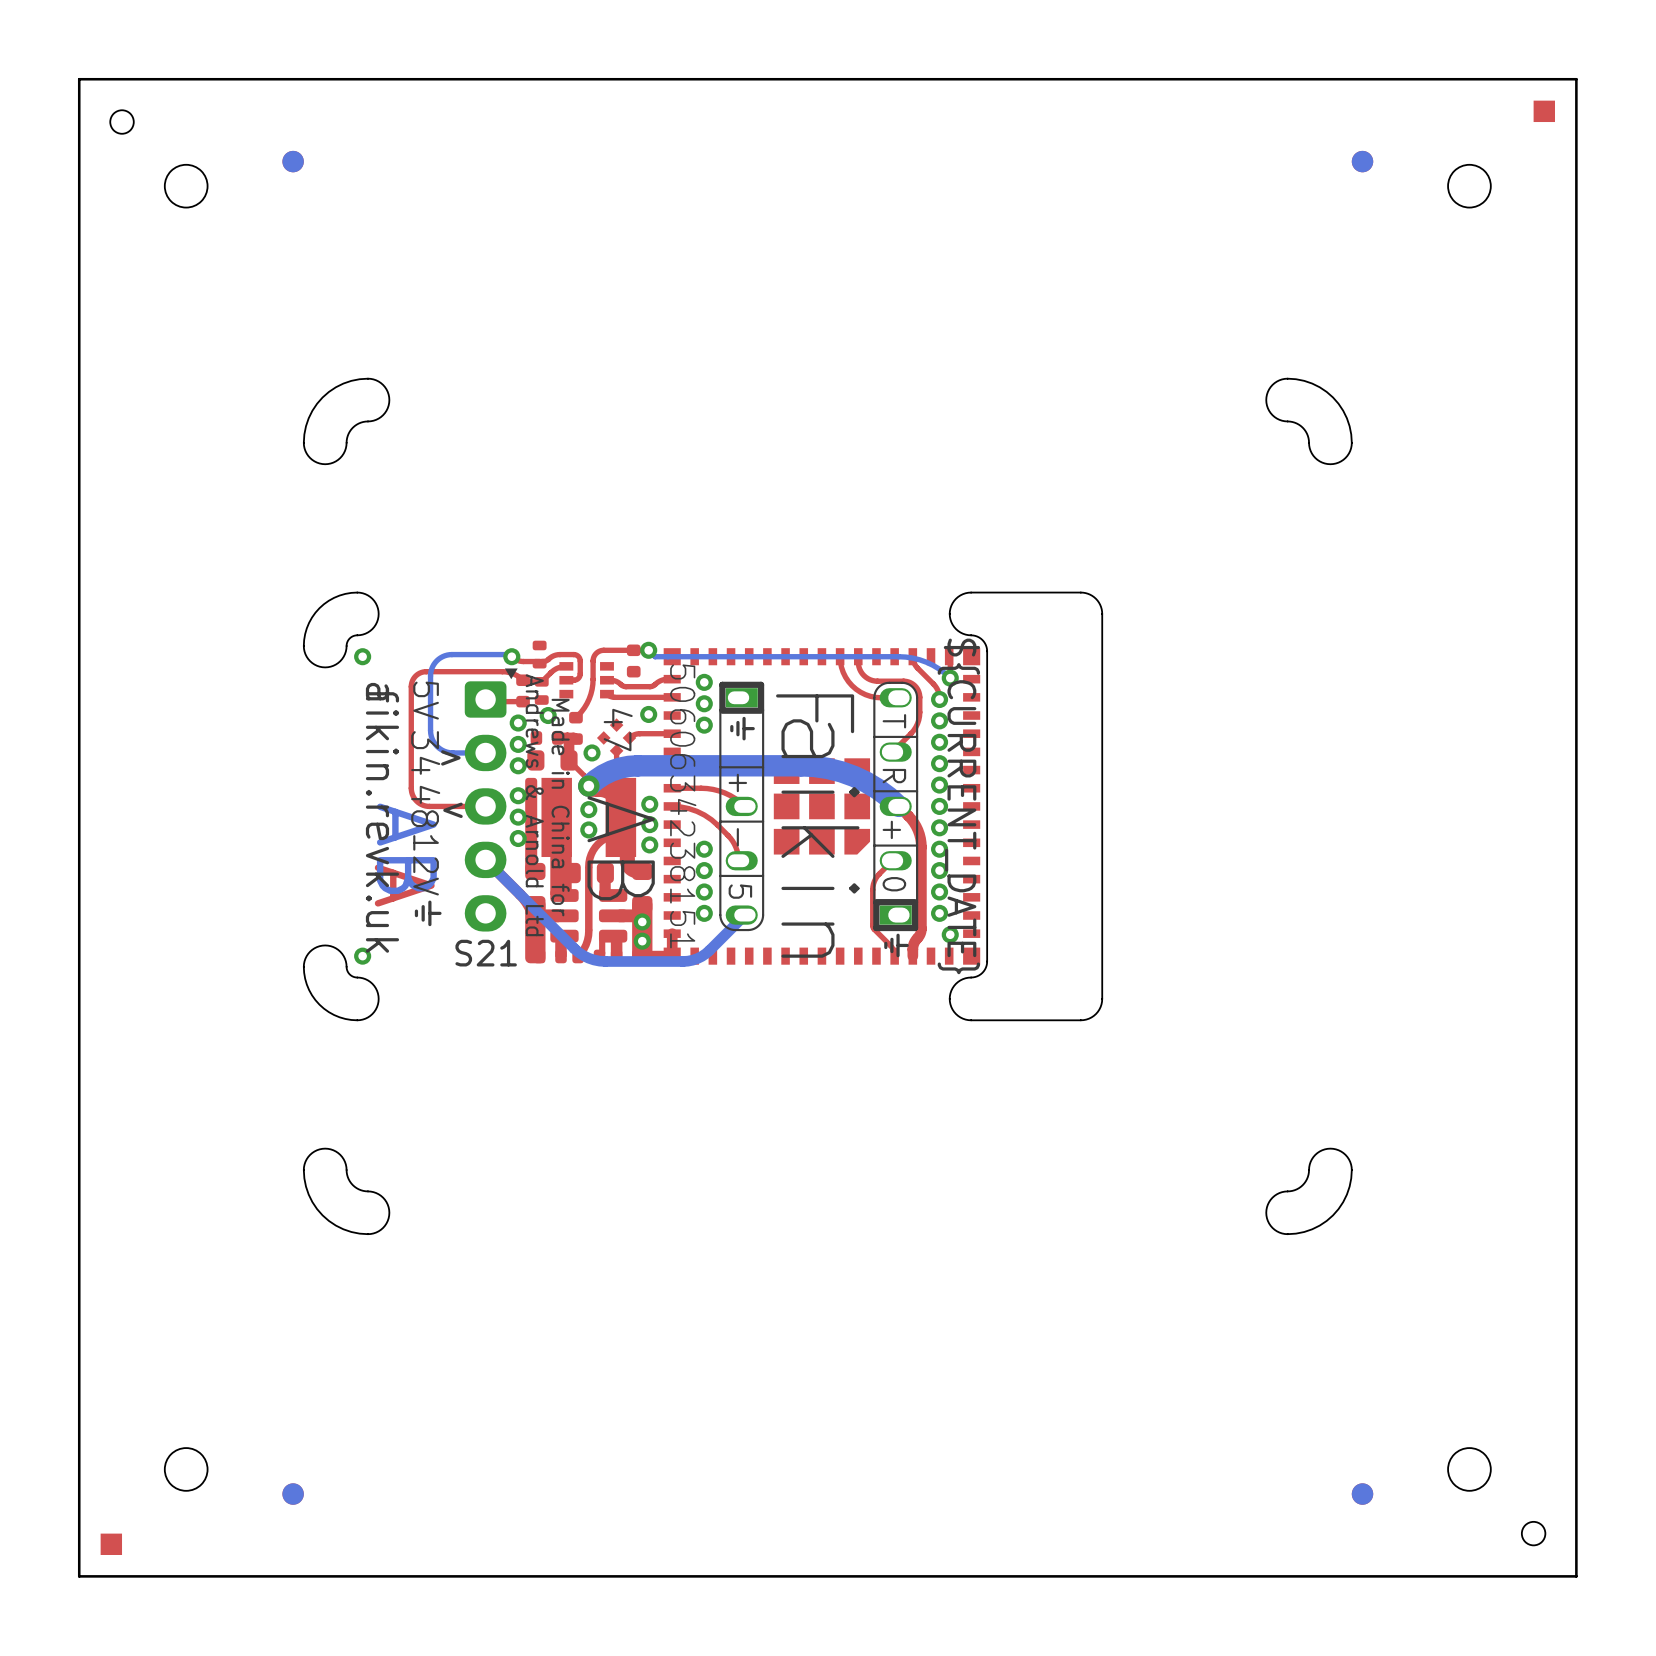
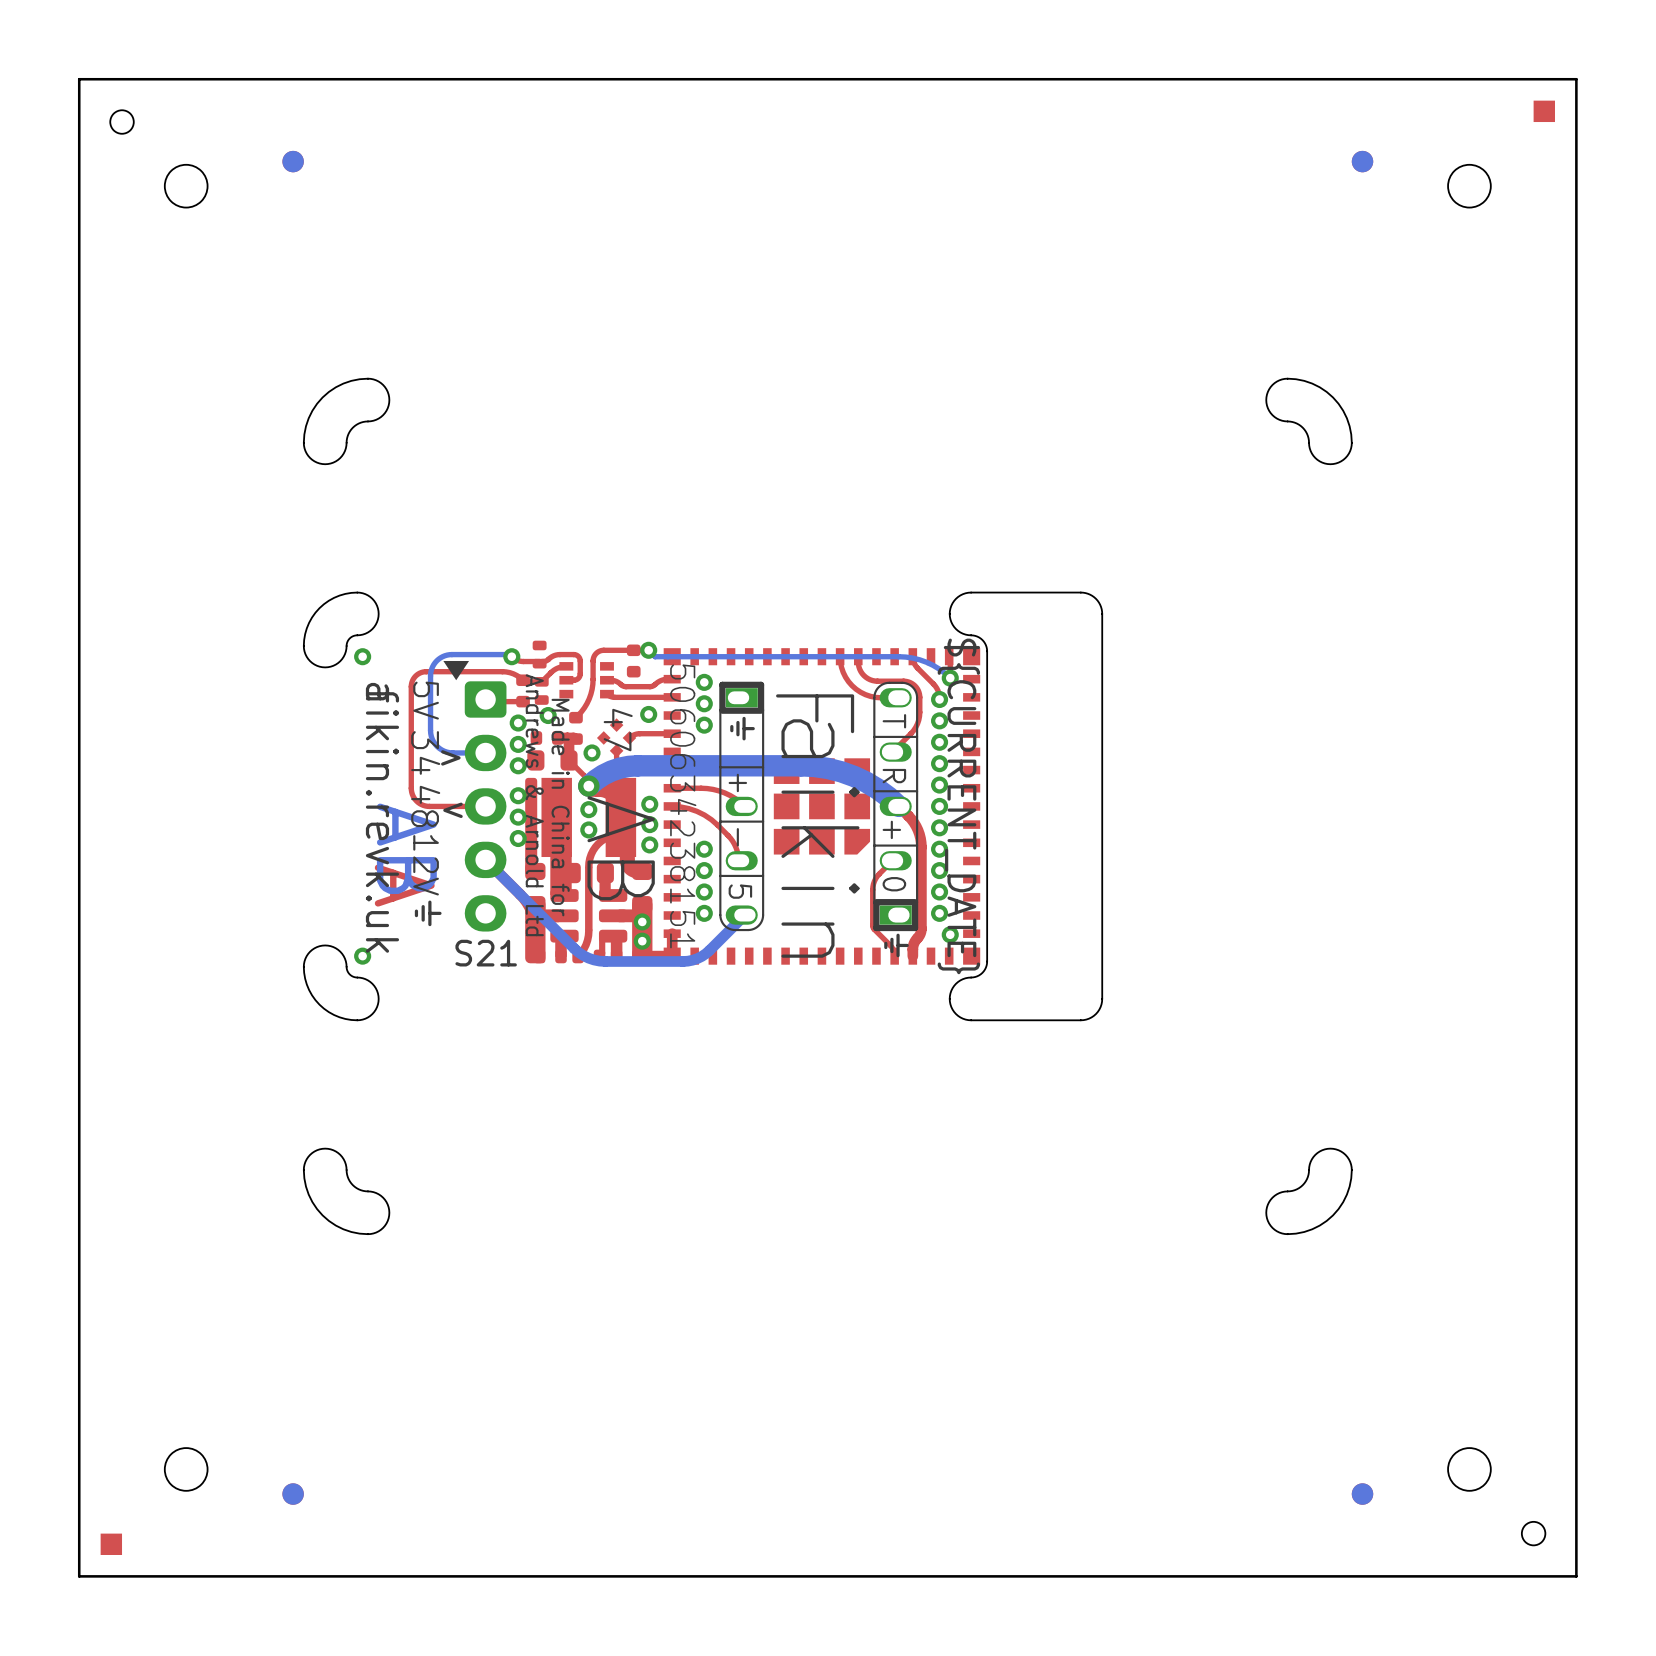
drawing: none -> [443, 660, 470, 681]
drawing: [504, 668, 518, 680] -> none

